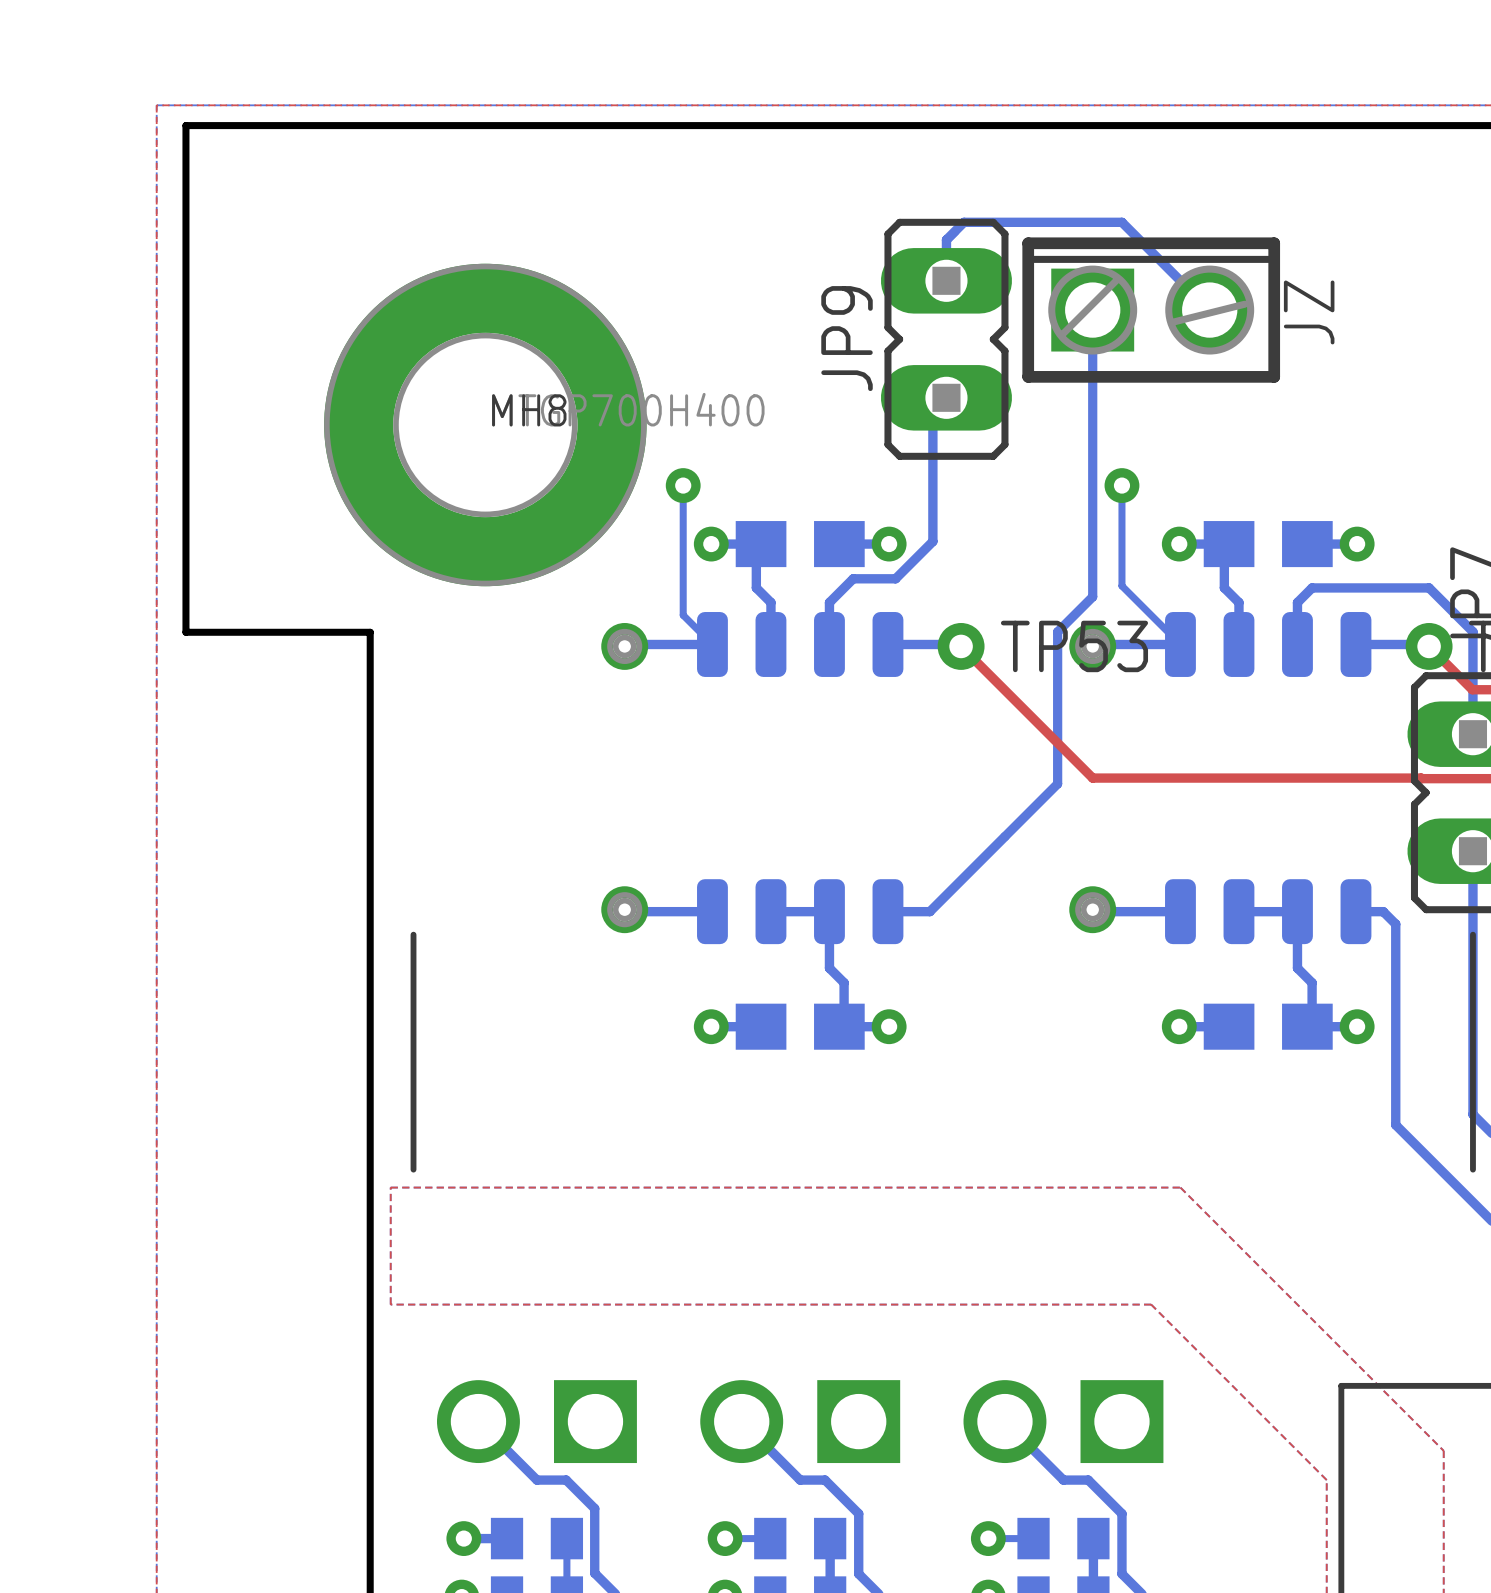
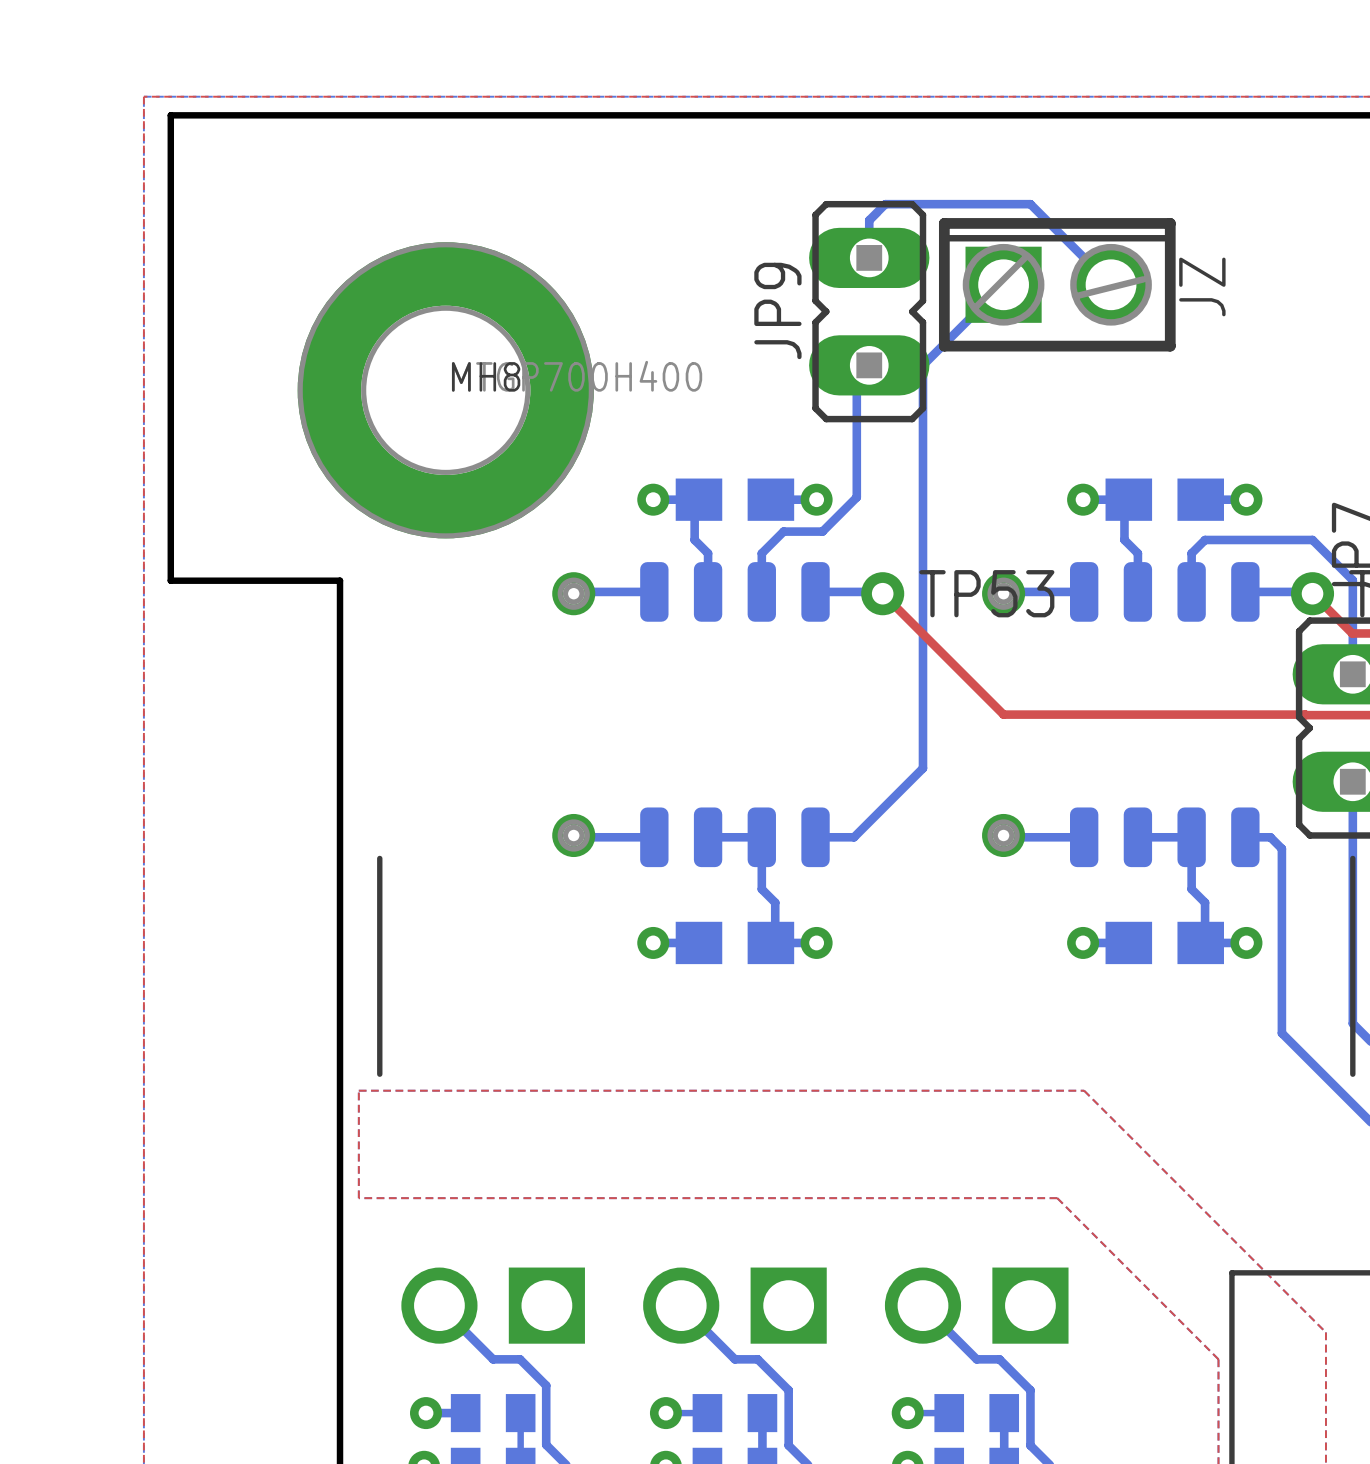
bottom track: (1092, 310) (1092, 596) (1057, 631) (1057, 783) (1004, 836) -> (1003, 284) (922, 365) (922, 768)
bottom track: (683, 485) (683, 615) (712, 644) -> none
via: (683, 485) -> none
bottom track: (1121, 485) (1121, 585) (1180, 644) -> none
via: (1121, 485) -> none

